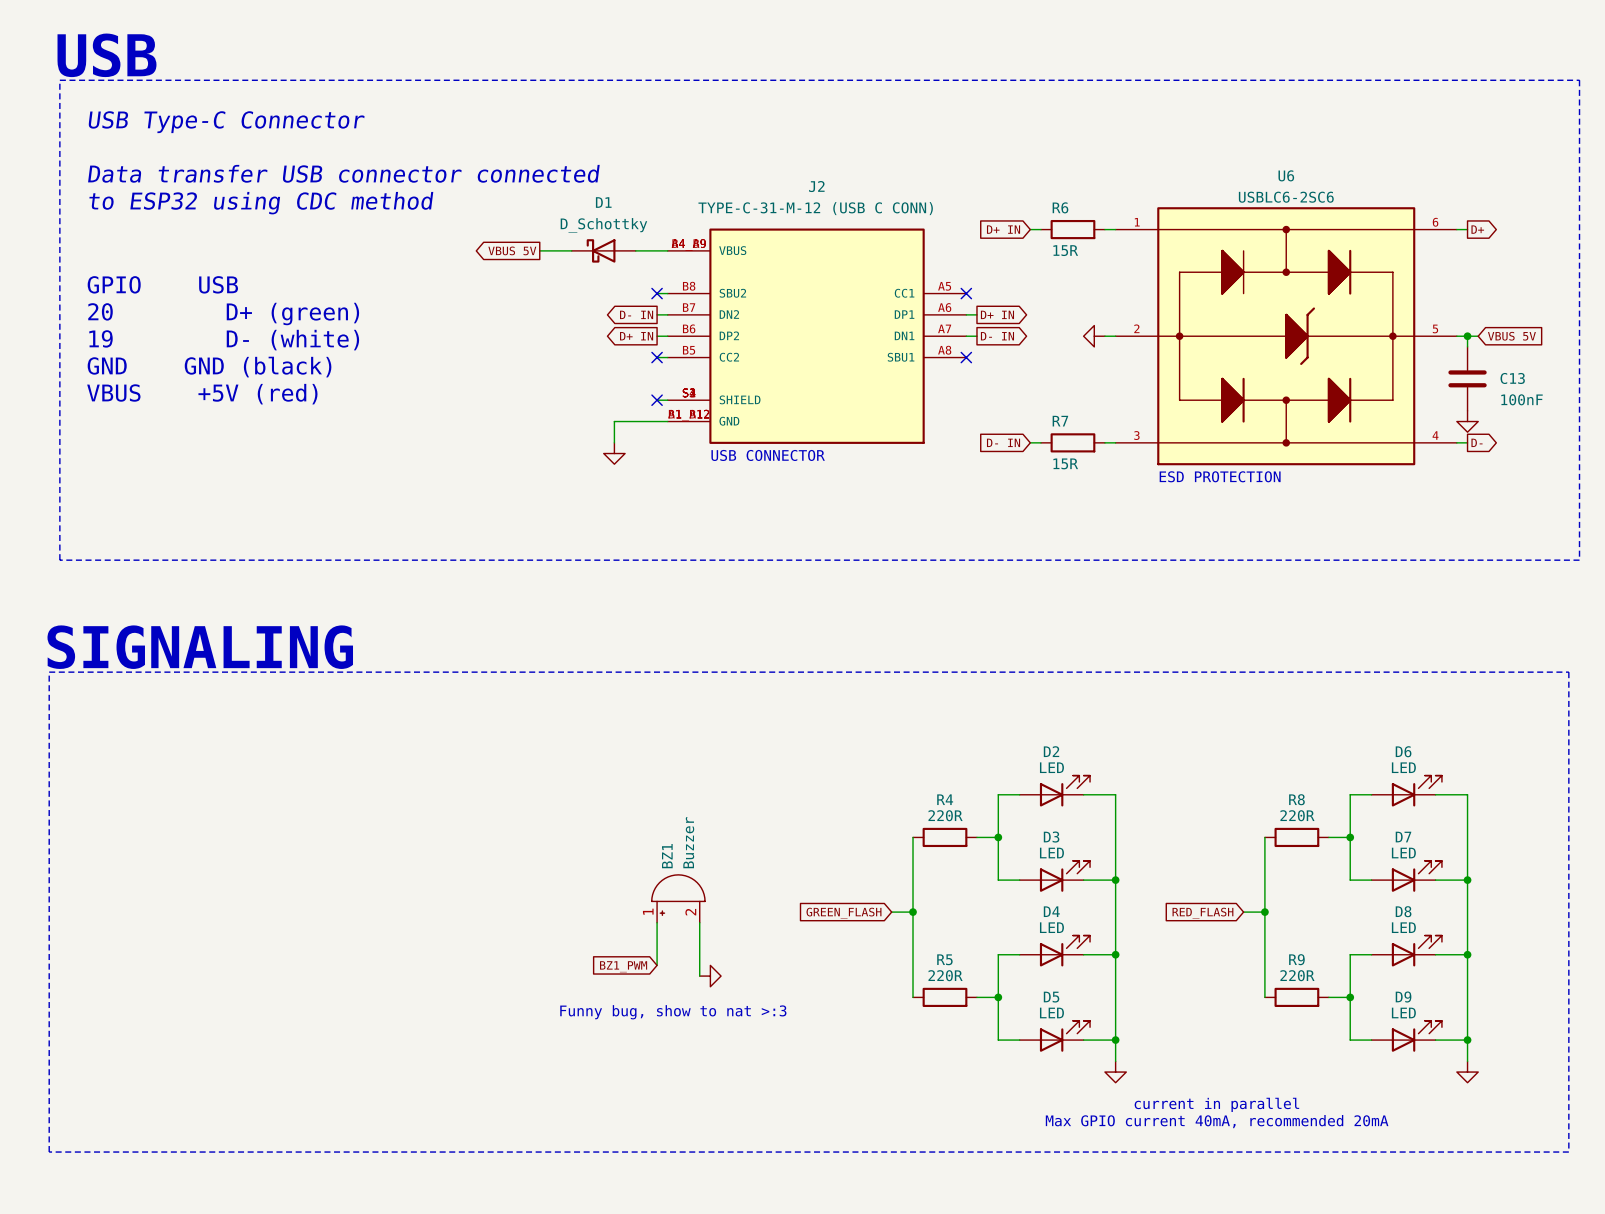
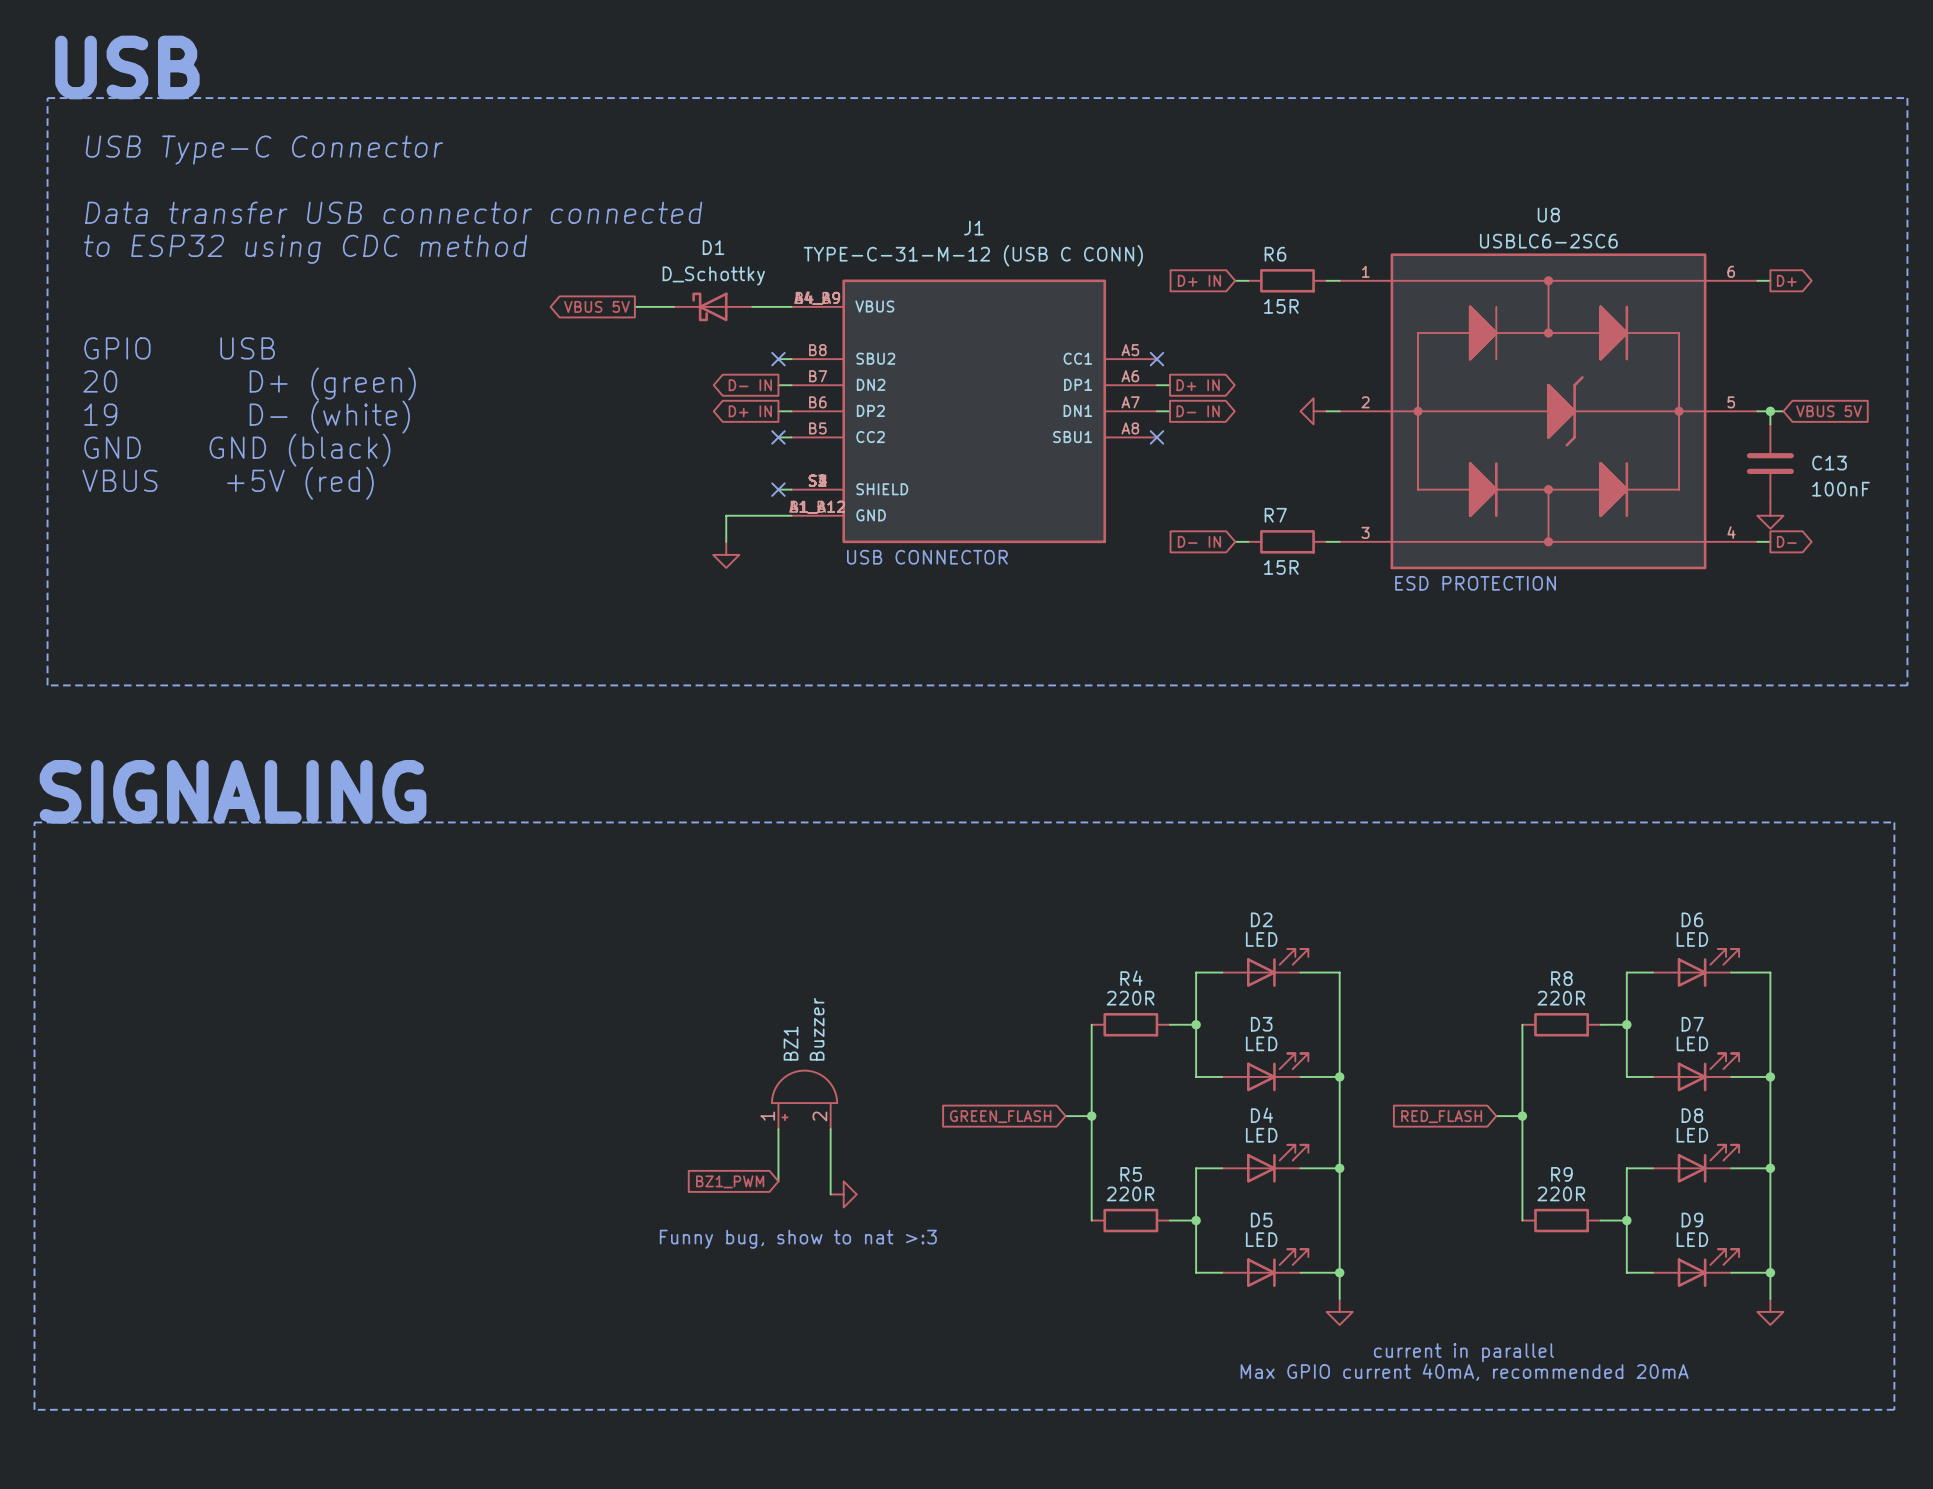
U6 name: U6 (1286, 175) -> U8 (1548, 215)
J2 name: J2 (816, 186) -> J1 (973, 228)

